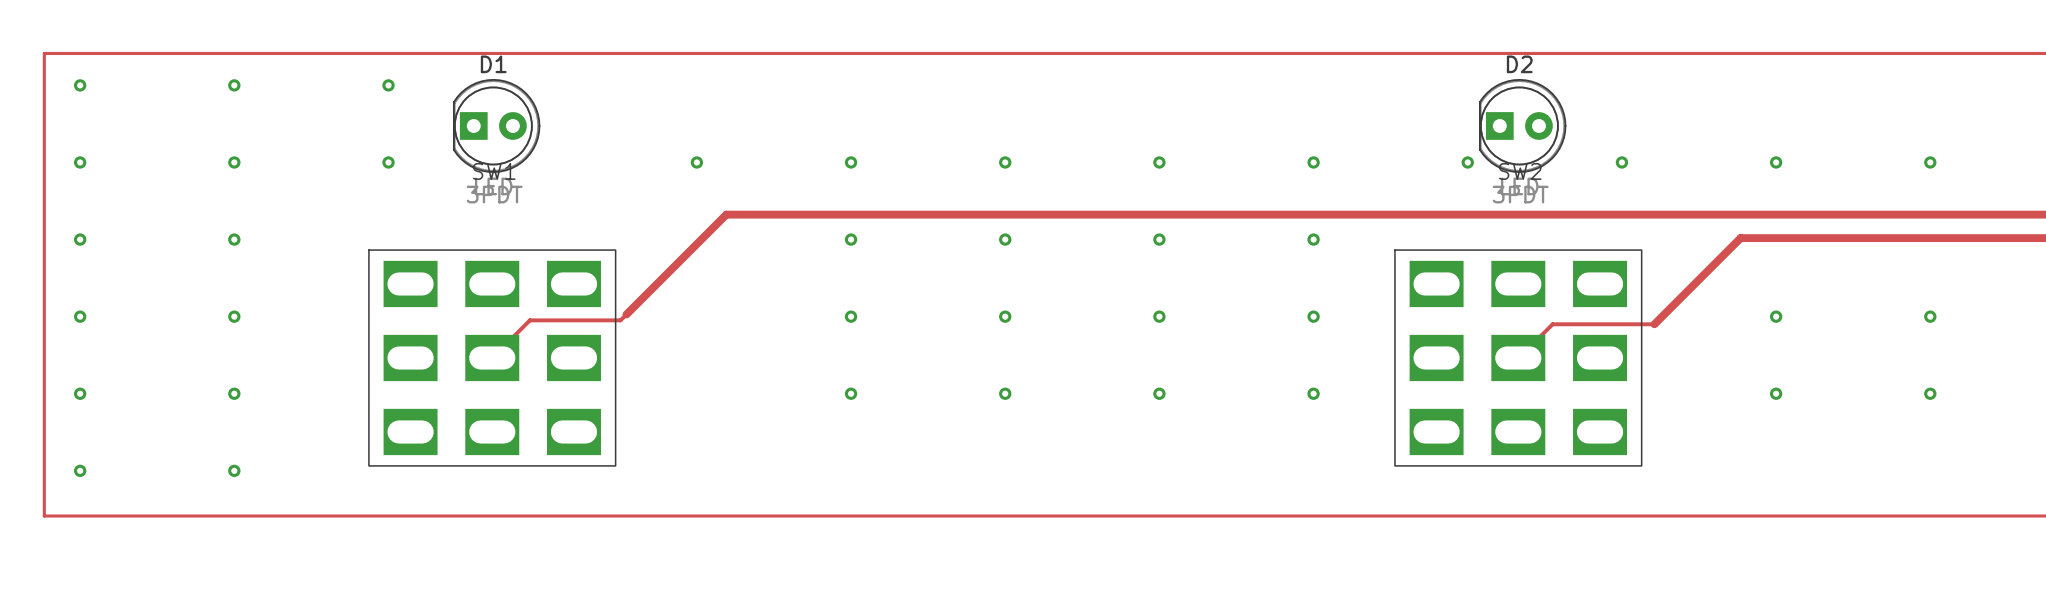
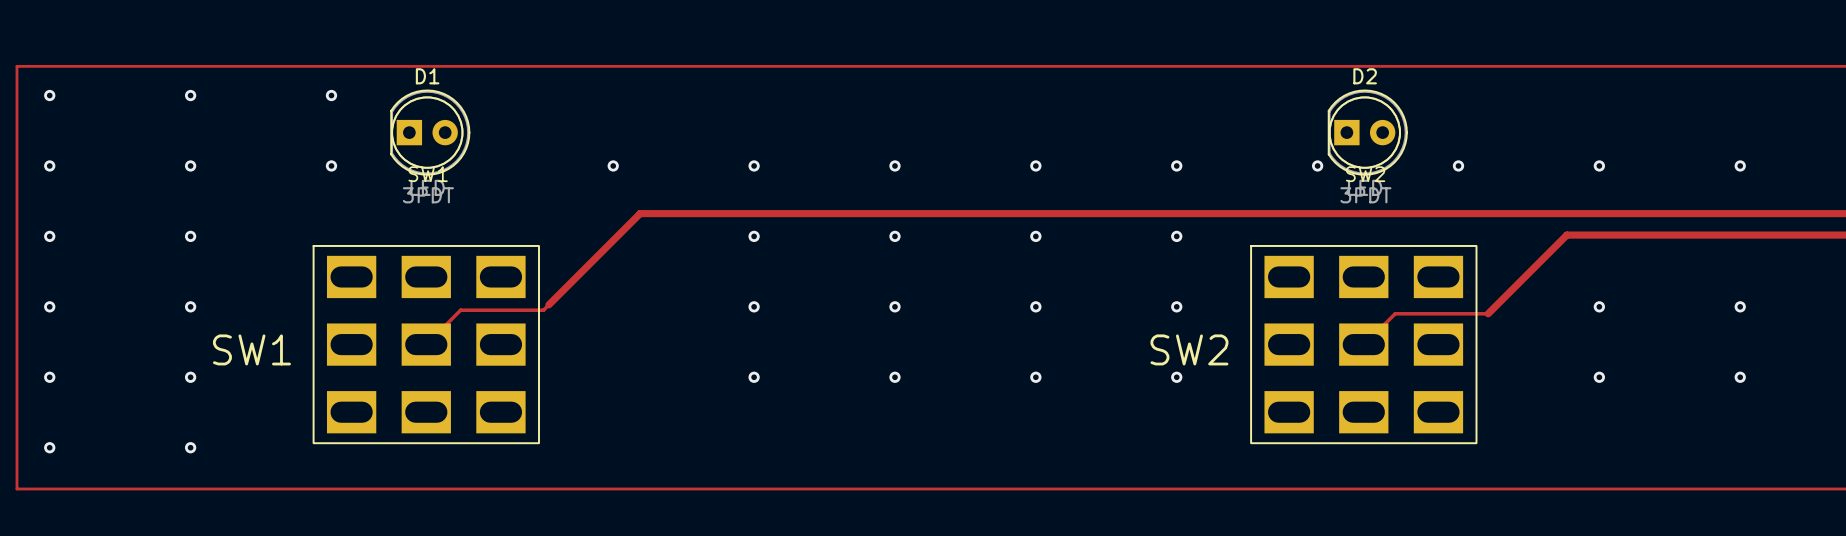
text: none -> SW1 (251, 349)
text: none -> SW2 (1189, 349)

